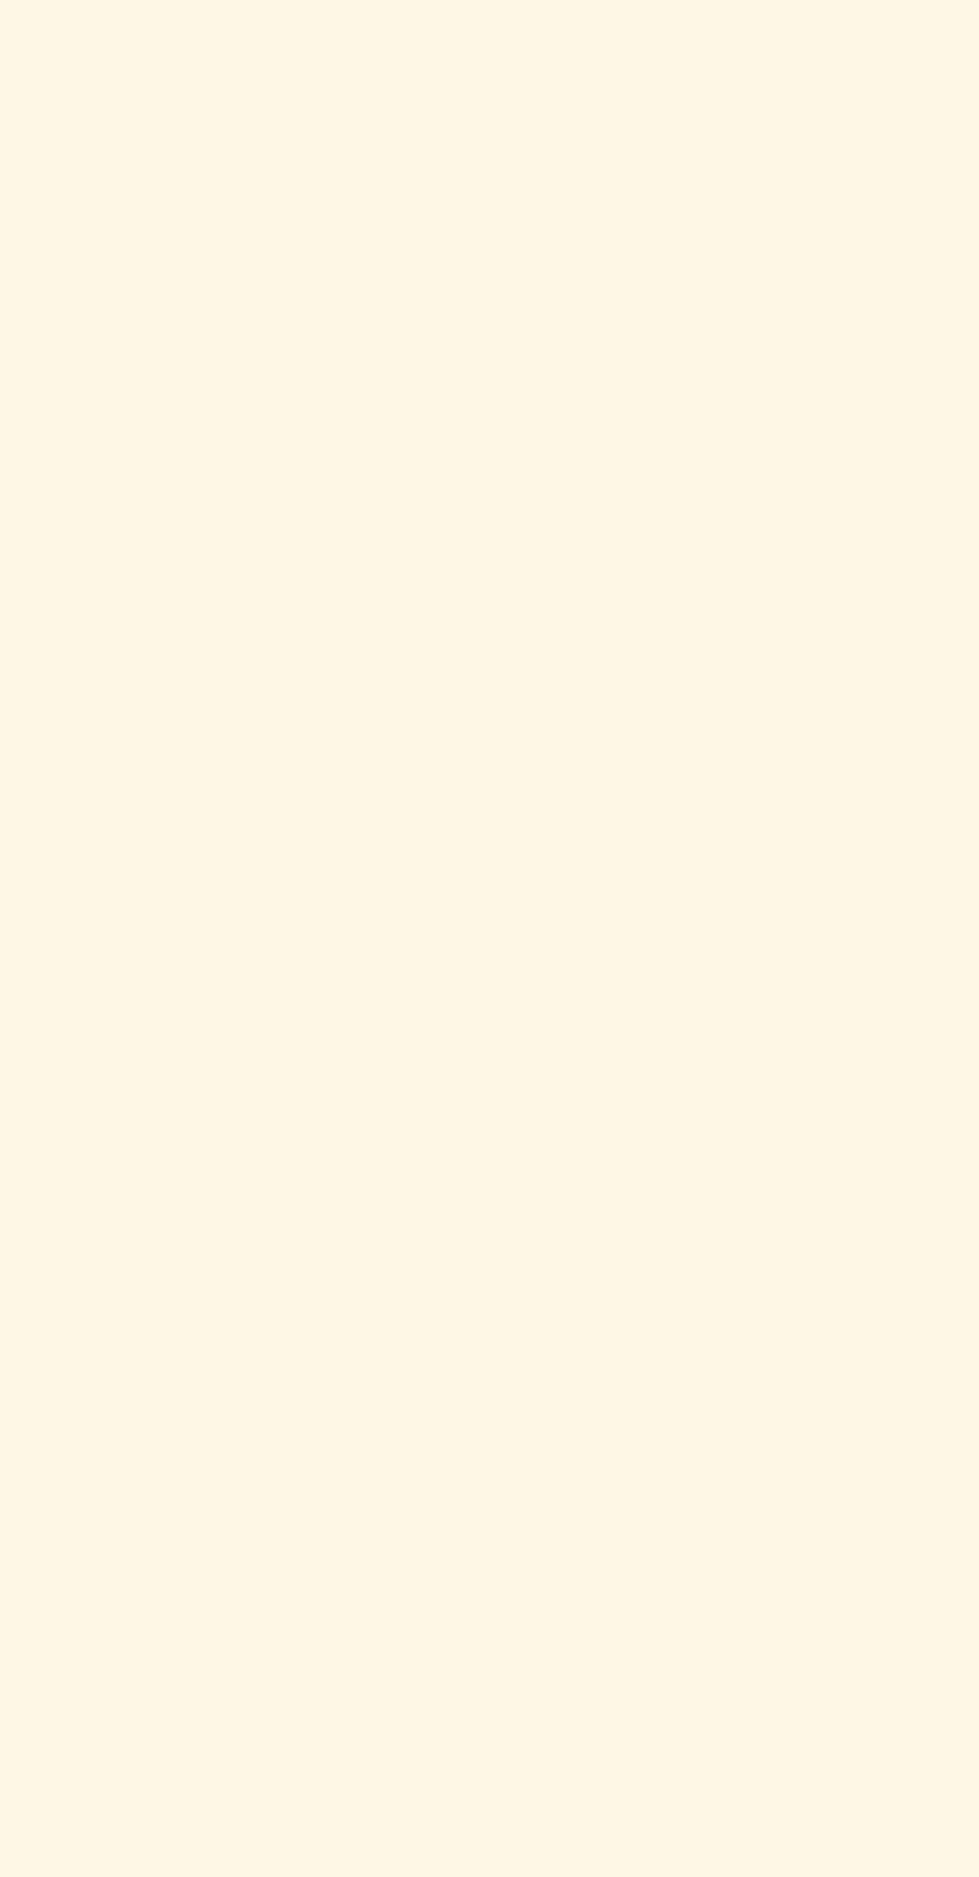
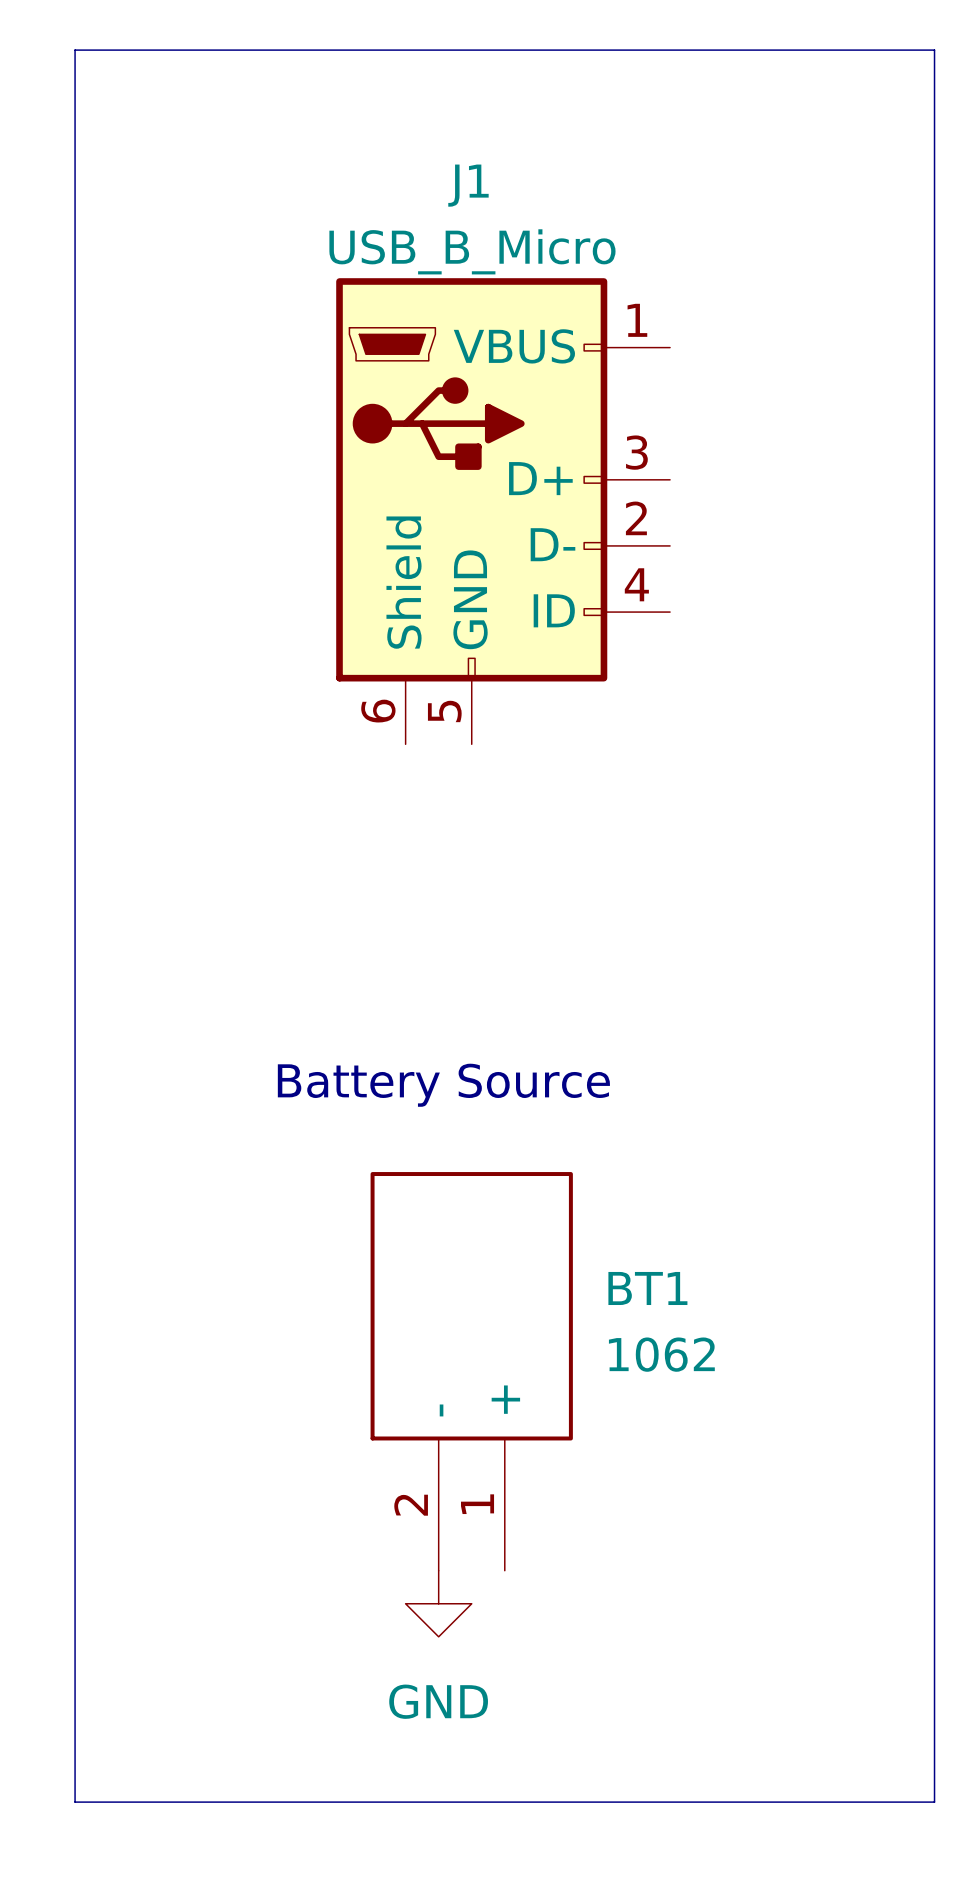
line: none -> (75, 50) (934, 50) (934, 1802) (75, 1802) (75, 50)
J1: none -> USB_B_Micro (503, 511)
text: none -> Battery Source (443, 1085)
BT1: none -> 1062 (471, 1371)
power symbol: none -> GND (438, 1603)

